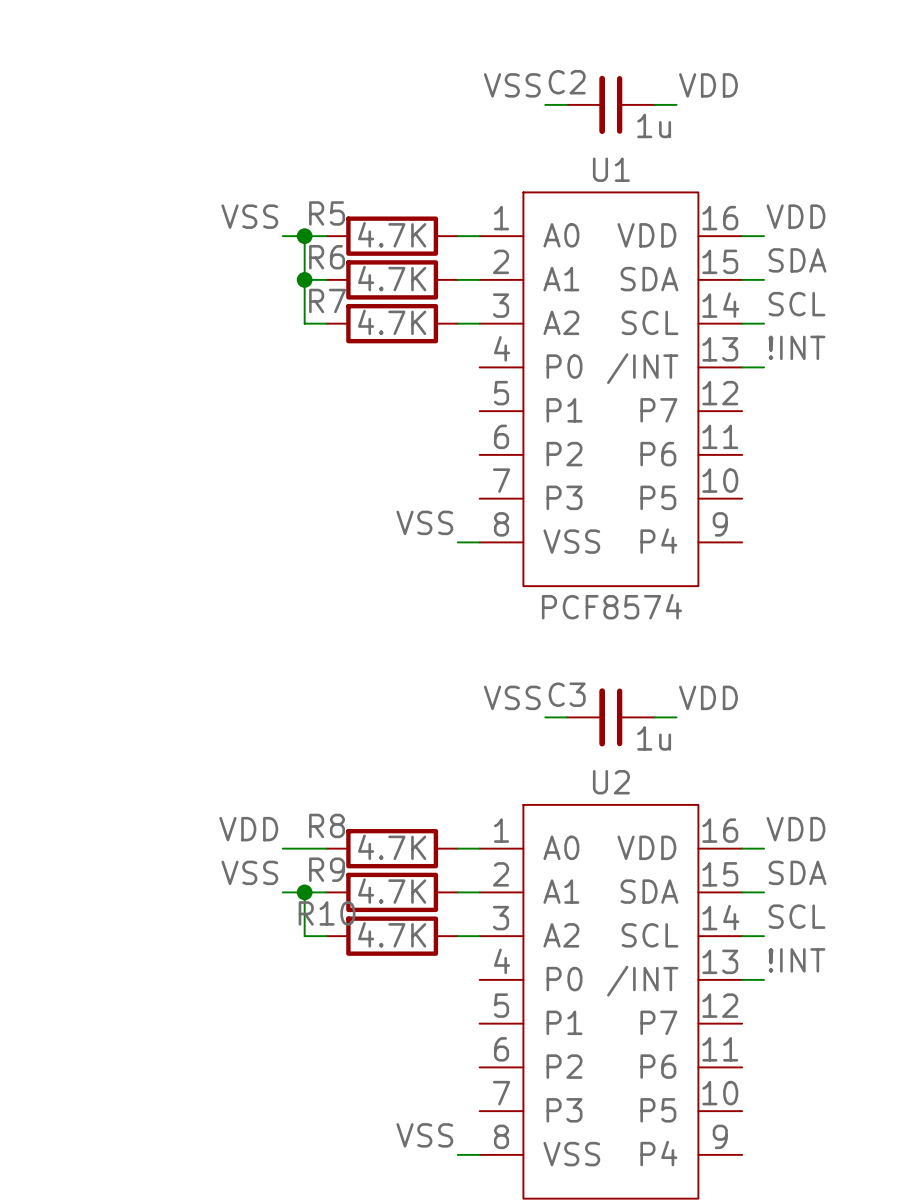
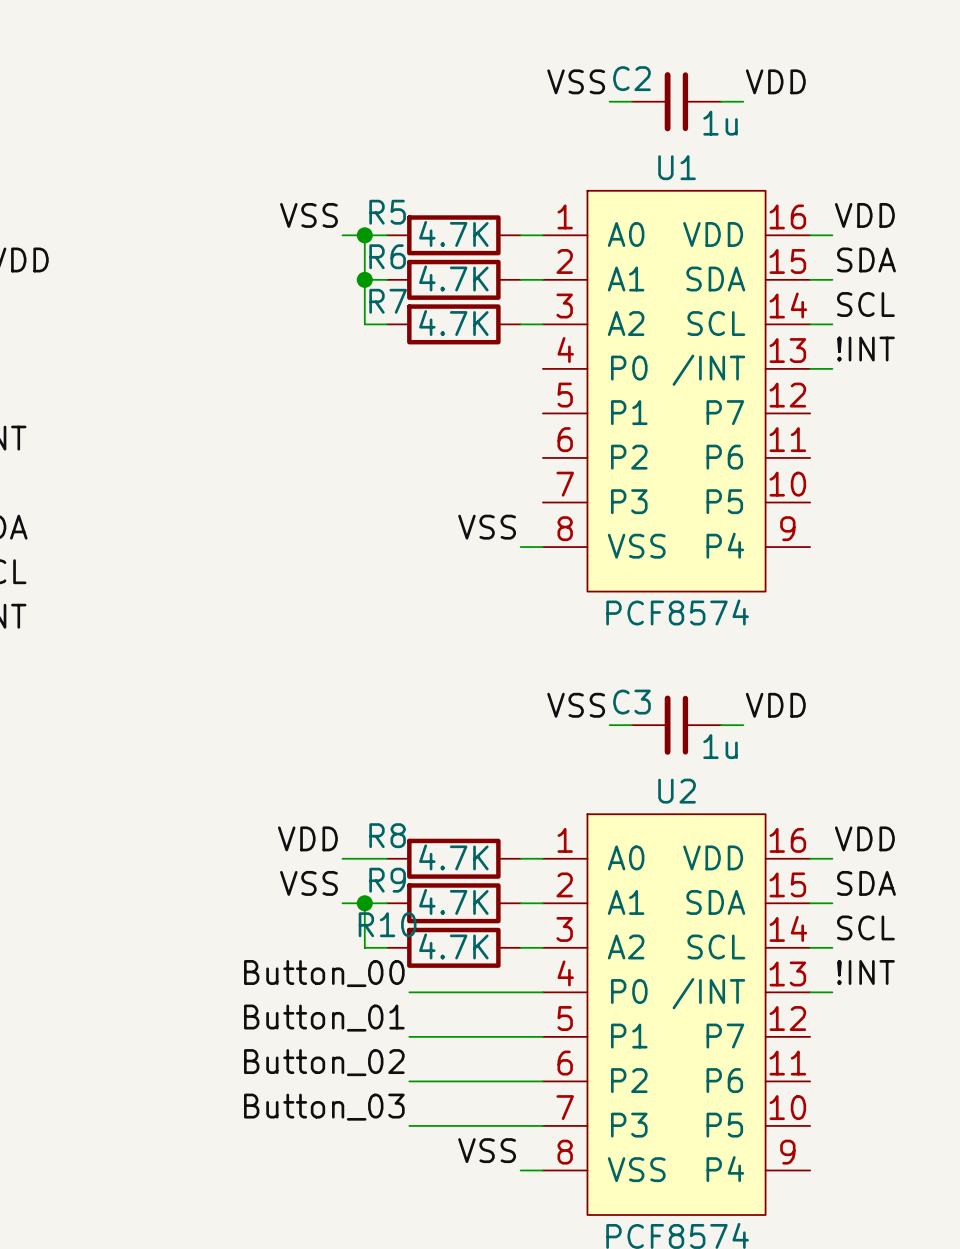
label: none -> Button_00 (324, 973)
wire: none -> (409, 992) (542, 992)
label: none -> Button_01 (324, 1018)
wire: none -> (409, 1036) (542, 1036)
label: none -> Button_02 (324, 1062)
wire: none -> (409, 1081) (542, 1081)
label: none -> Button_03 (324, 1107)
wire: none -> (409, 1125) (542, 1125)

